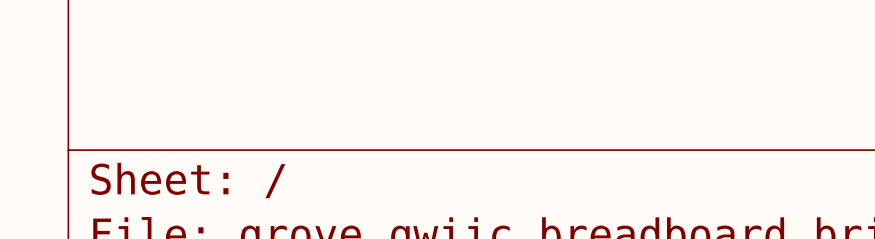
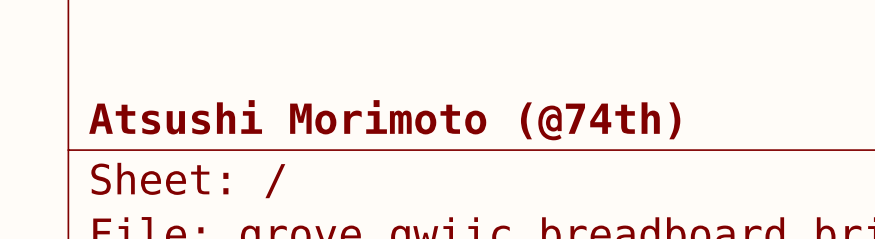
title block: none -> Atsushi Morimoto (@74th) (384, 120)

